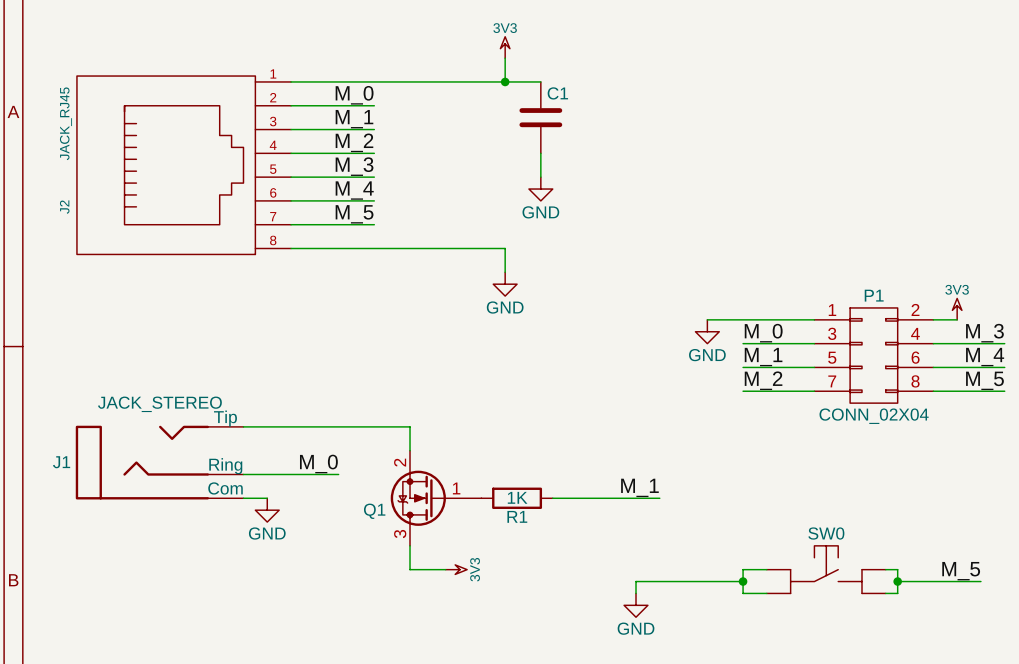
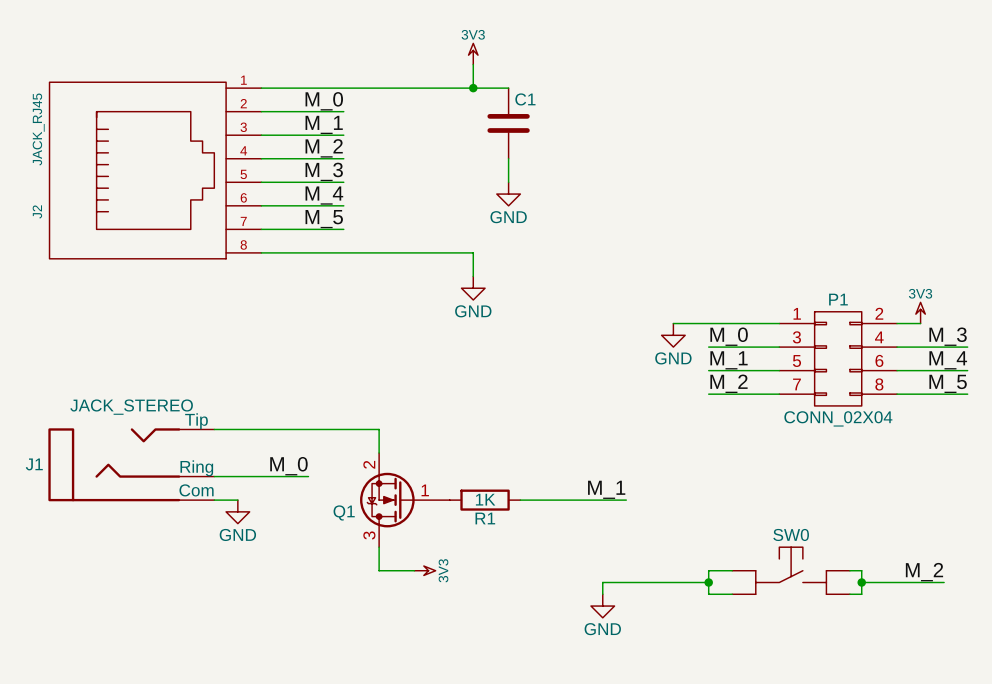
label: M_5 (961, 571) -> M_2 (924, 572)

